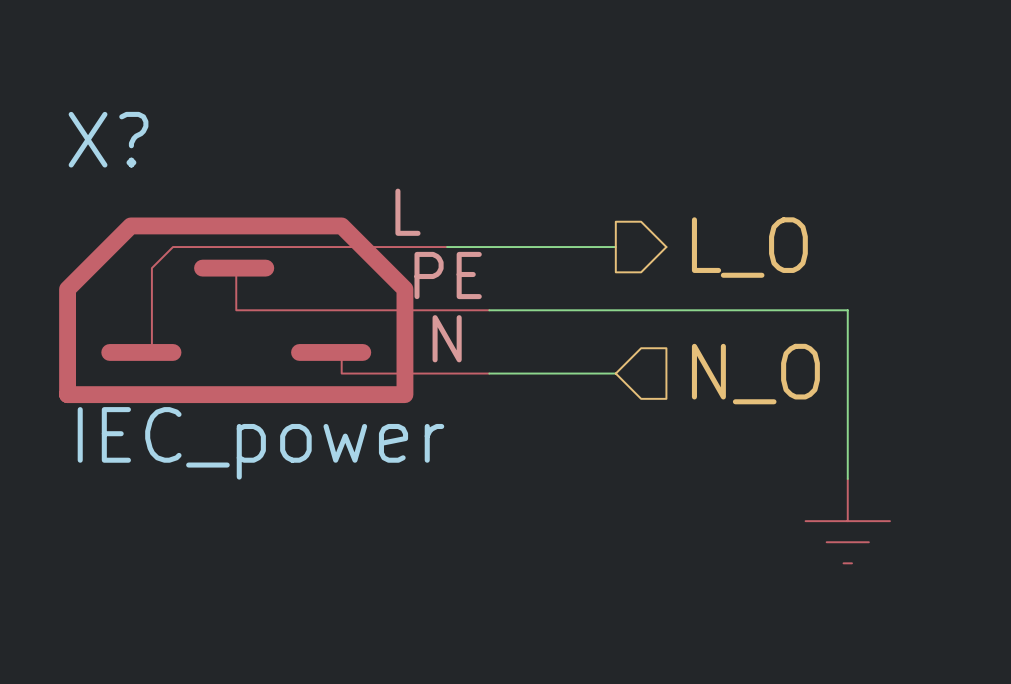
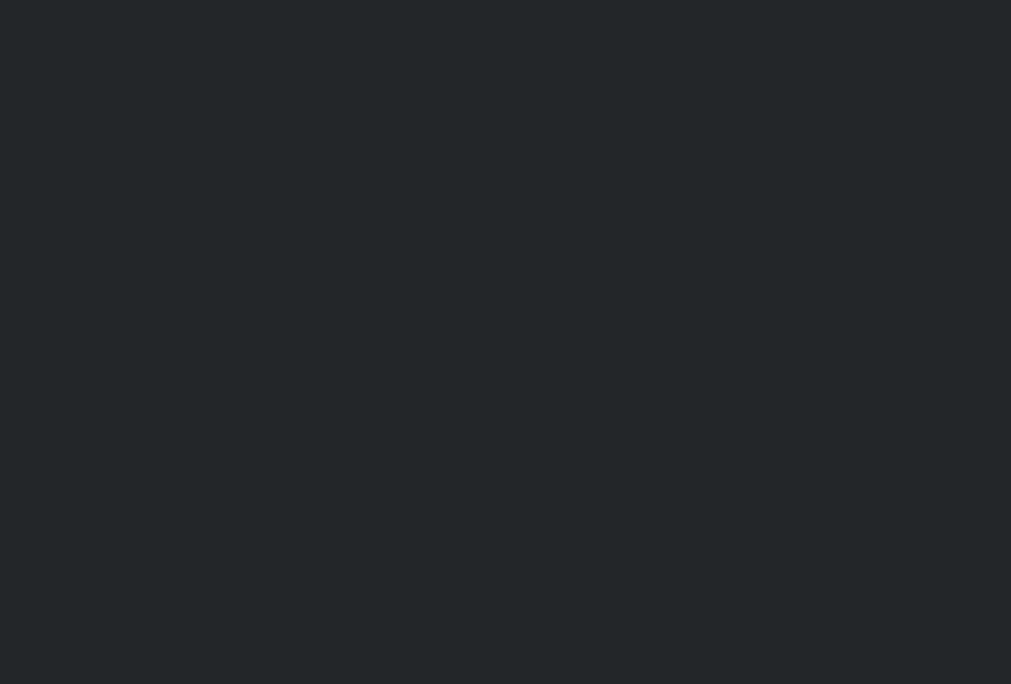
wire: (447, 247) (615, 247) -> none
hierarchical label: L_O (749, 247) -> none
X?: IEC_power (274, 310) -> none
wire: (489, 310) (847, 310) (847, 478) -> none
wire: (489, 373) (615, 373) -> none
hierarchical label: N_O (755, 374) -> none
power symbol: (847, 521) -> none

